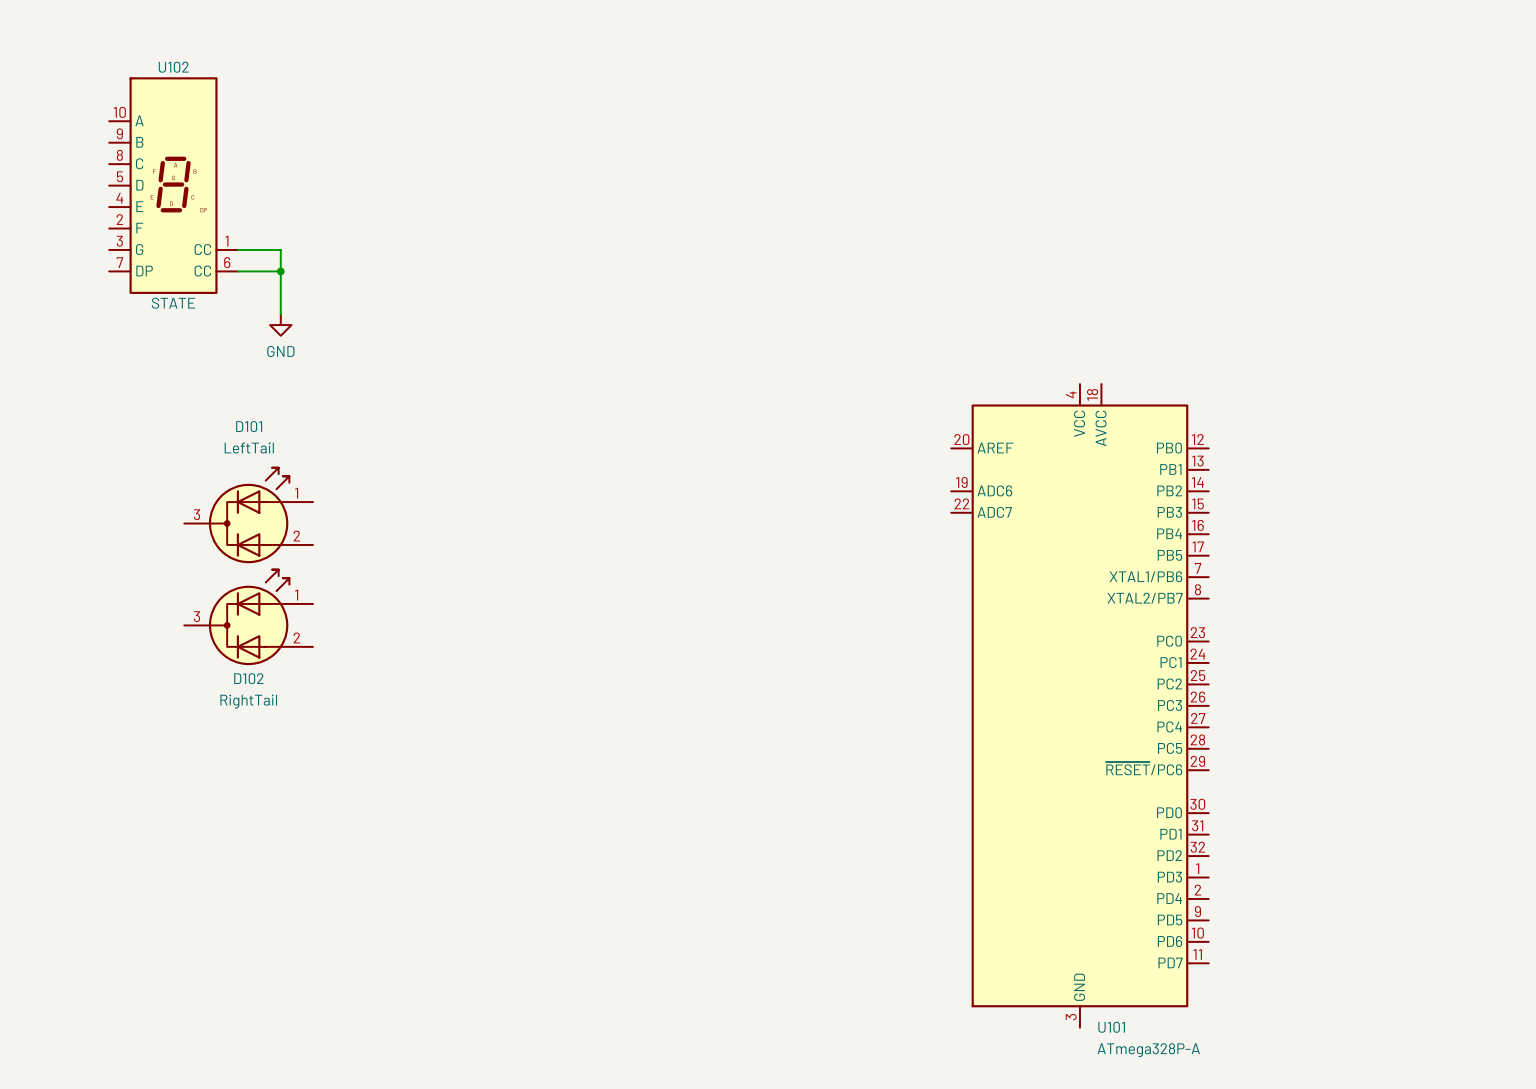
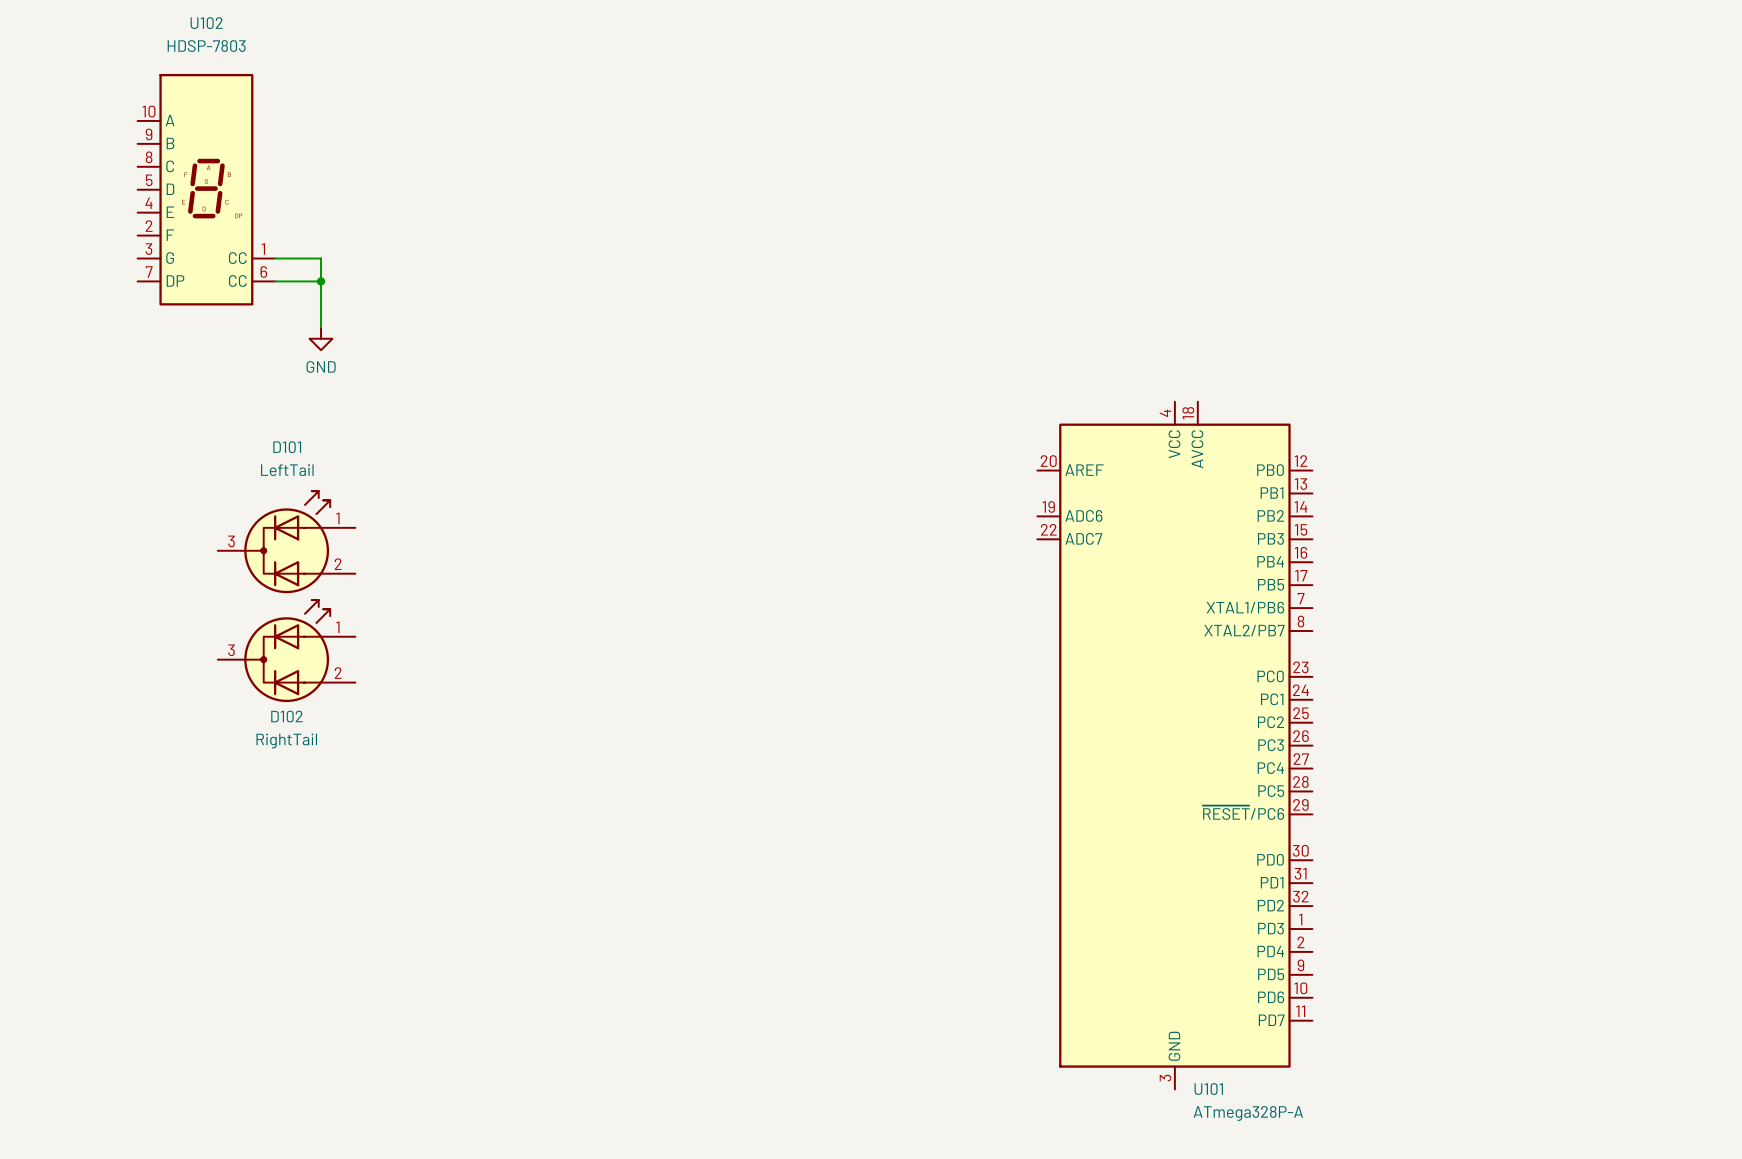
U102 name position: U102 (173, 67) -> U102 (206, 23)
U102 value: STATE (173, 303) -> HDSP-7803 (206, 46)

